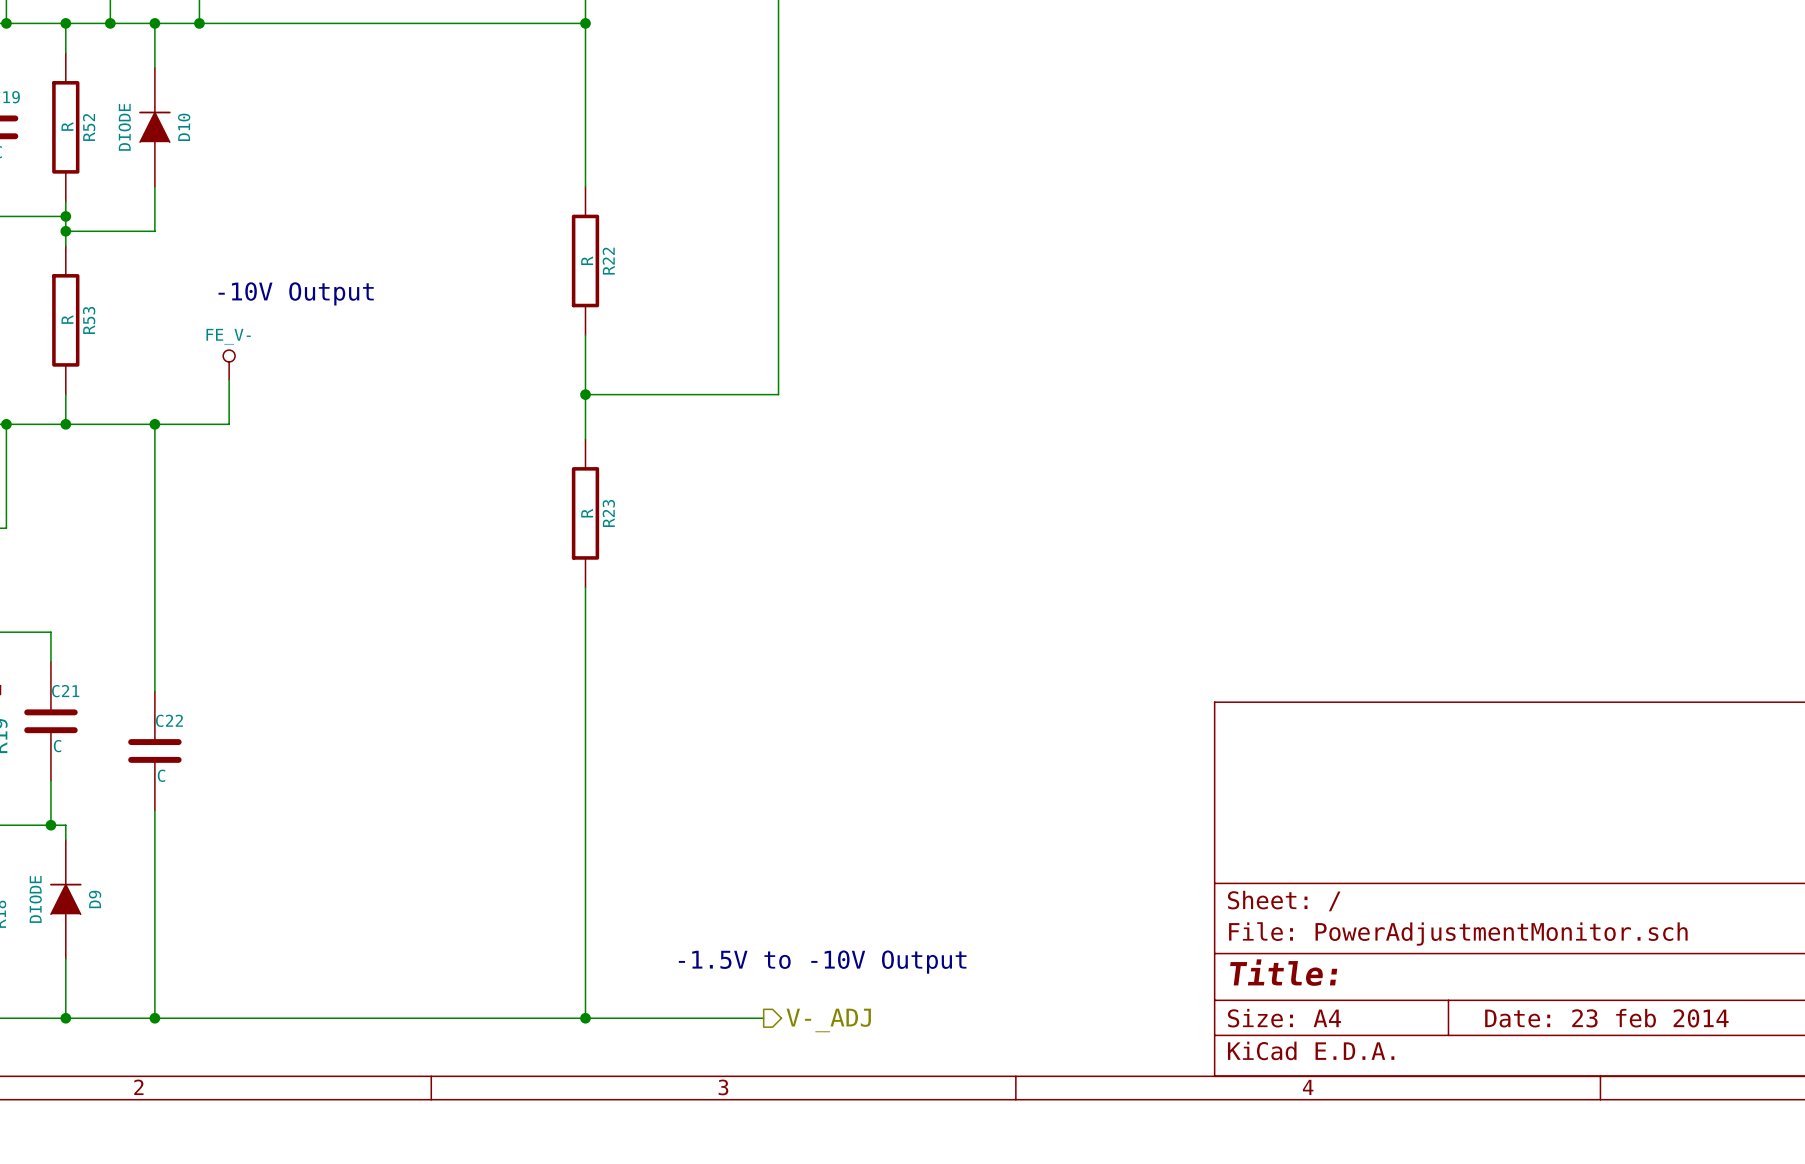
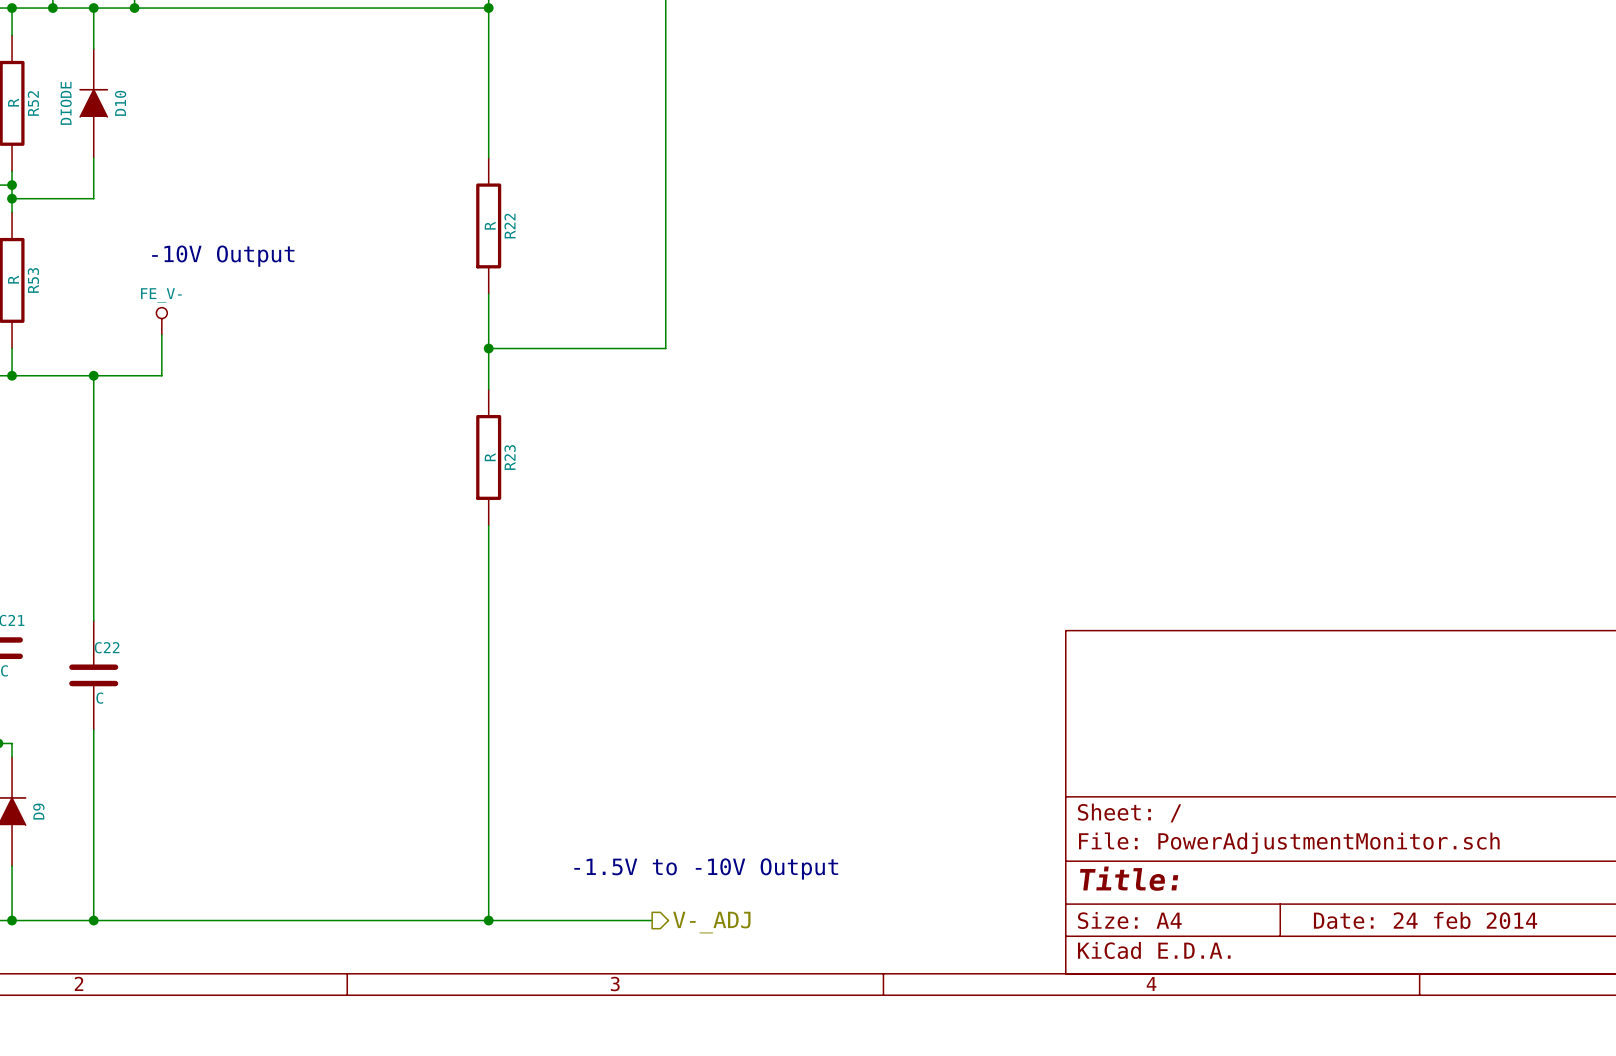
title block: Date: 23 feb 2014 (1606, 1018) -> Date: 24 feb 2014 (1425, 920)

